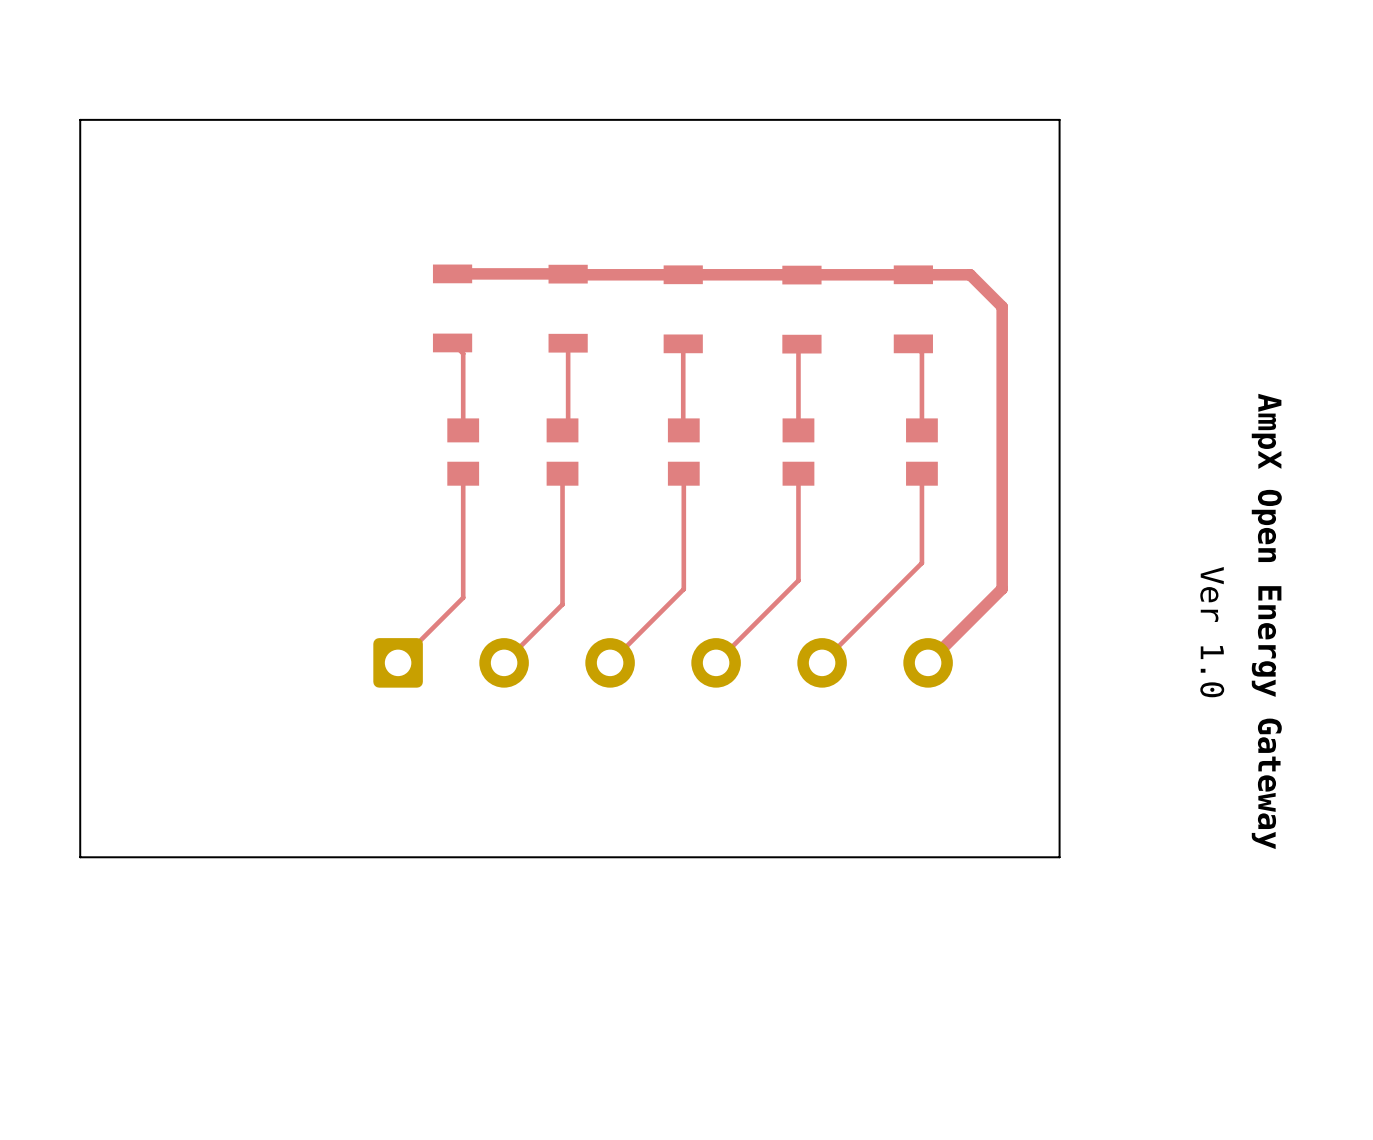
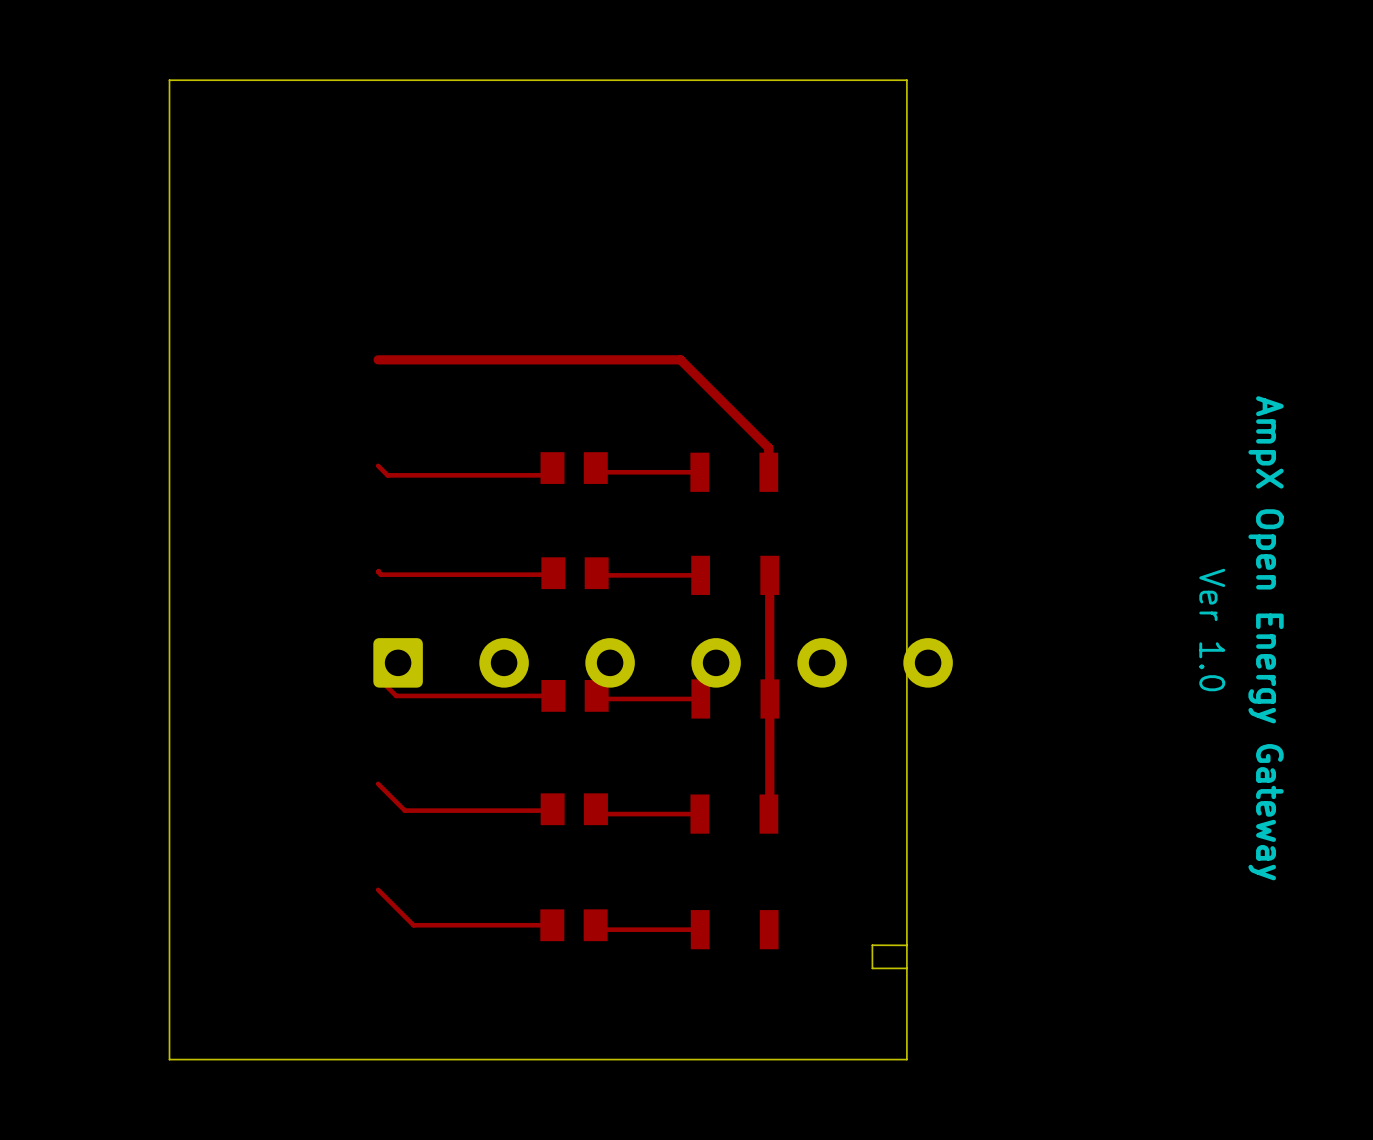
board edge: (1059, 119) (80, 119) (80, 857) (1059, 857) (1059, 119) -> (906, 80) (906, 1059) (169, 1059) (169, 80) (906, 80)
top track: (452, 273) (970, 274) (1002, 306) (1002, 588) (928, 662) -> none
part: (452, 308) -> none
part: (568, 308) -> none
part: (683, 309) -> none
part: (801, 309) -> none
part: (913, 309) -> none
top track: (452, 342) (463, 353) (463, 430) (464, 428) -> none
top track: (568, 343) (568, 424) (562, 430) -> none
top track: (683, 343) (683, 430) -> none
top track: (913, 343) (921, 352) (921, 430) (919, 427) -> none
top track: (798, 347) (798, 430) -> none
top track: none -> (378, 359) (680, 359) (768, 448) (768, 472)
part: (463, 452) -> none
part rotation: 0° (562, 452) -> 90° clockwise (574, 468)
part: (683, 452) -> none
part: (798, 452) -> none
part: (921, 452) -> none
top track: none -> (378, 465) (387, 475) (544, 475)
top track: none -> (595, 468) (600, 472) (699, 472)
part: none -> (734, 472)
top track: (463, 473) (463, 597) (398, 662) -> none
top track: (562, 473) (562, 604) (504, 662) -> none
top track: (683, 473) (683, 589) (610, 662) -> none
top track: (798, 473) (798, 580) (716, 662) (716, 641) -> none
top track: (921, 473) (921, 563) (822, 662) -> none
top track: none -> (378, 571) (380, 574) (544, 574)
part: none -> (575, 573)
top track: none -> (596, 573) (598, 575) (700, 575)
part: none -> (735, 575)
top track: none -> (769, 575) (769, 813)
top track: none -> (399, 677) (378, 677) (396, 695) (544, 695)
part: none -> (575, 695)
top track: none -> (596, 695) (599, 698) (700, 698)
part: none -> (735, 698)
top track: none -> (378, 783) (404, 810) (544, 810)
part: none -> (574, 809)
top track: none -> (595, 809) (600, 814) (699, 814)
part: none -> (734, 814)
top track: none -> (378, 889) (413, 925) (552, 925)
part: none -> (573, 925)
top track: none -> (595, 925) (600, 929) (700, 929)
part: none -> (734, 929)
board edge: none -> (906, 945) (872, 945) (872, 968) (907, 968)

